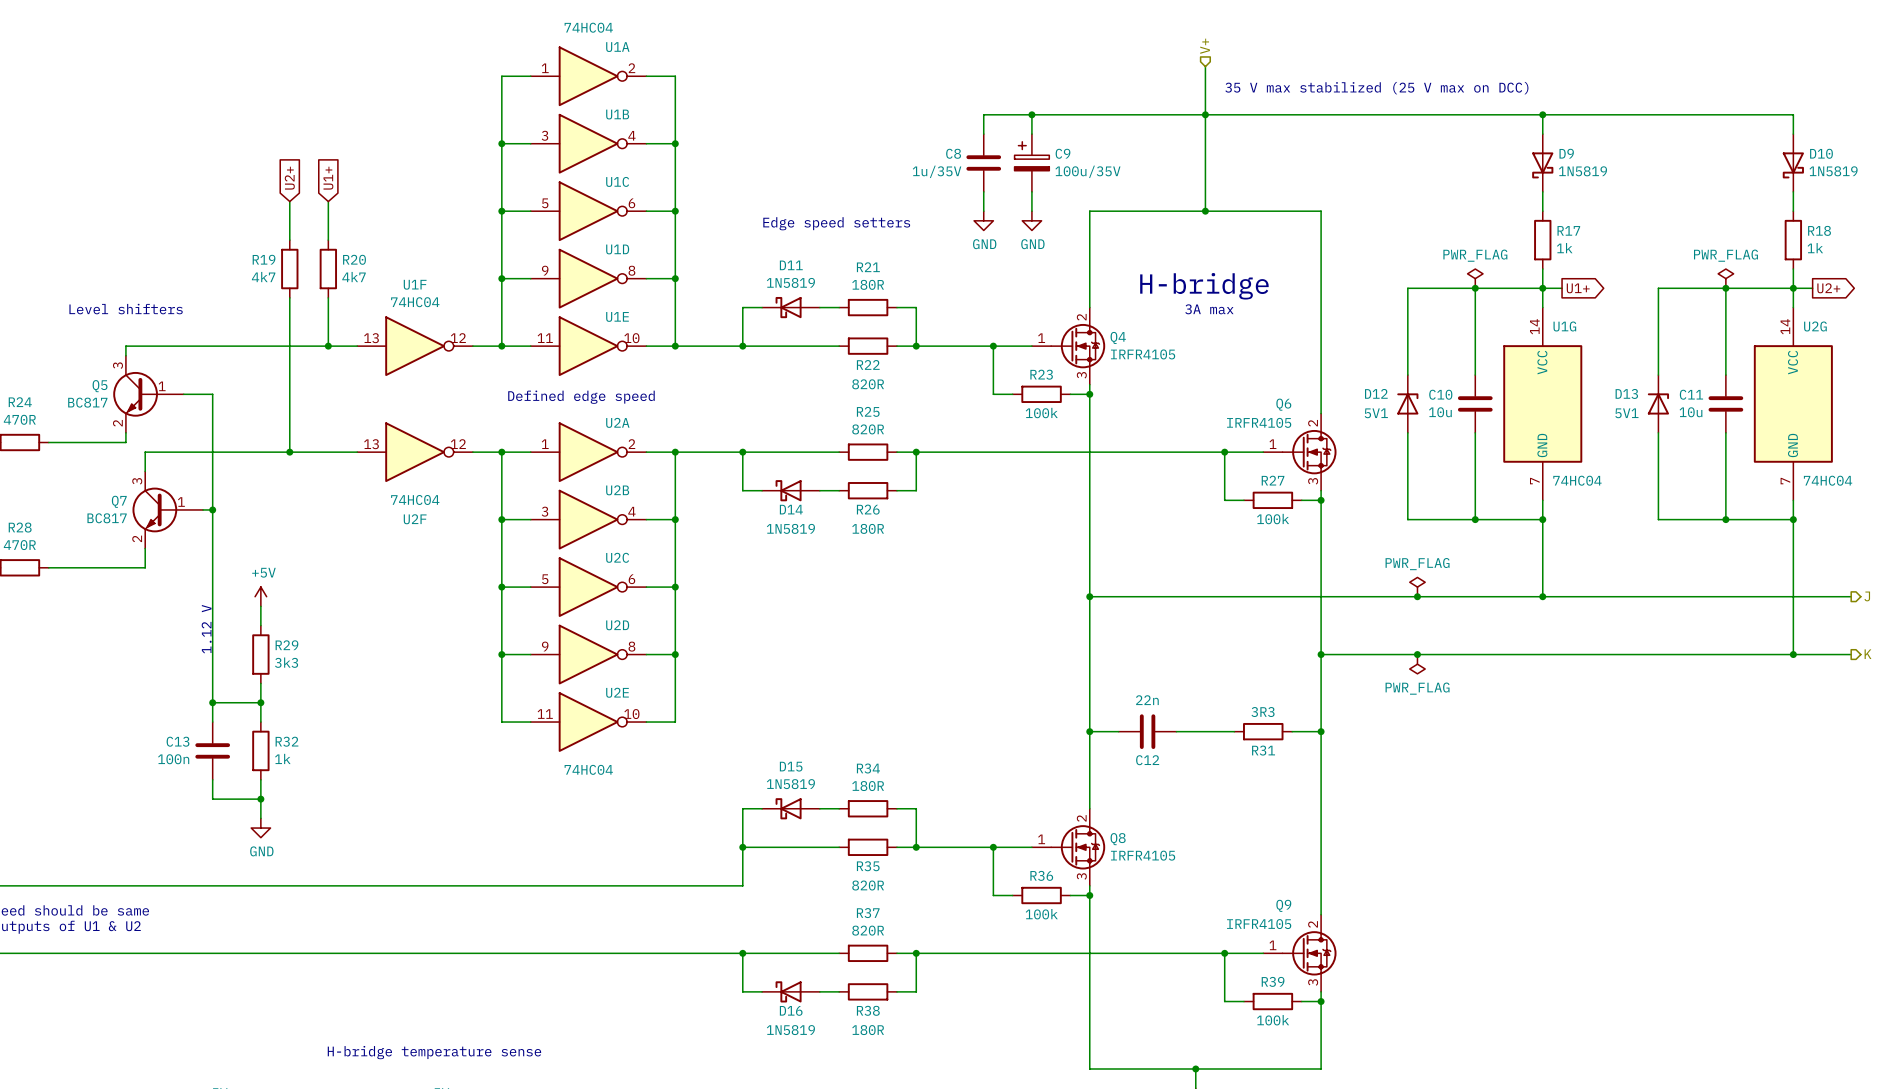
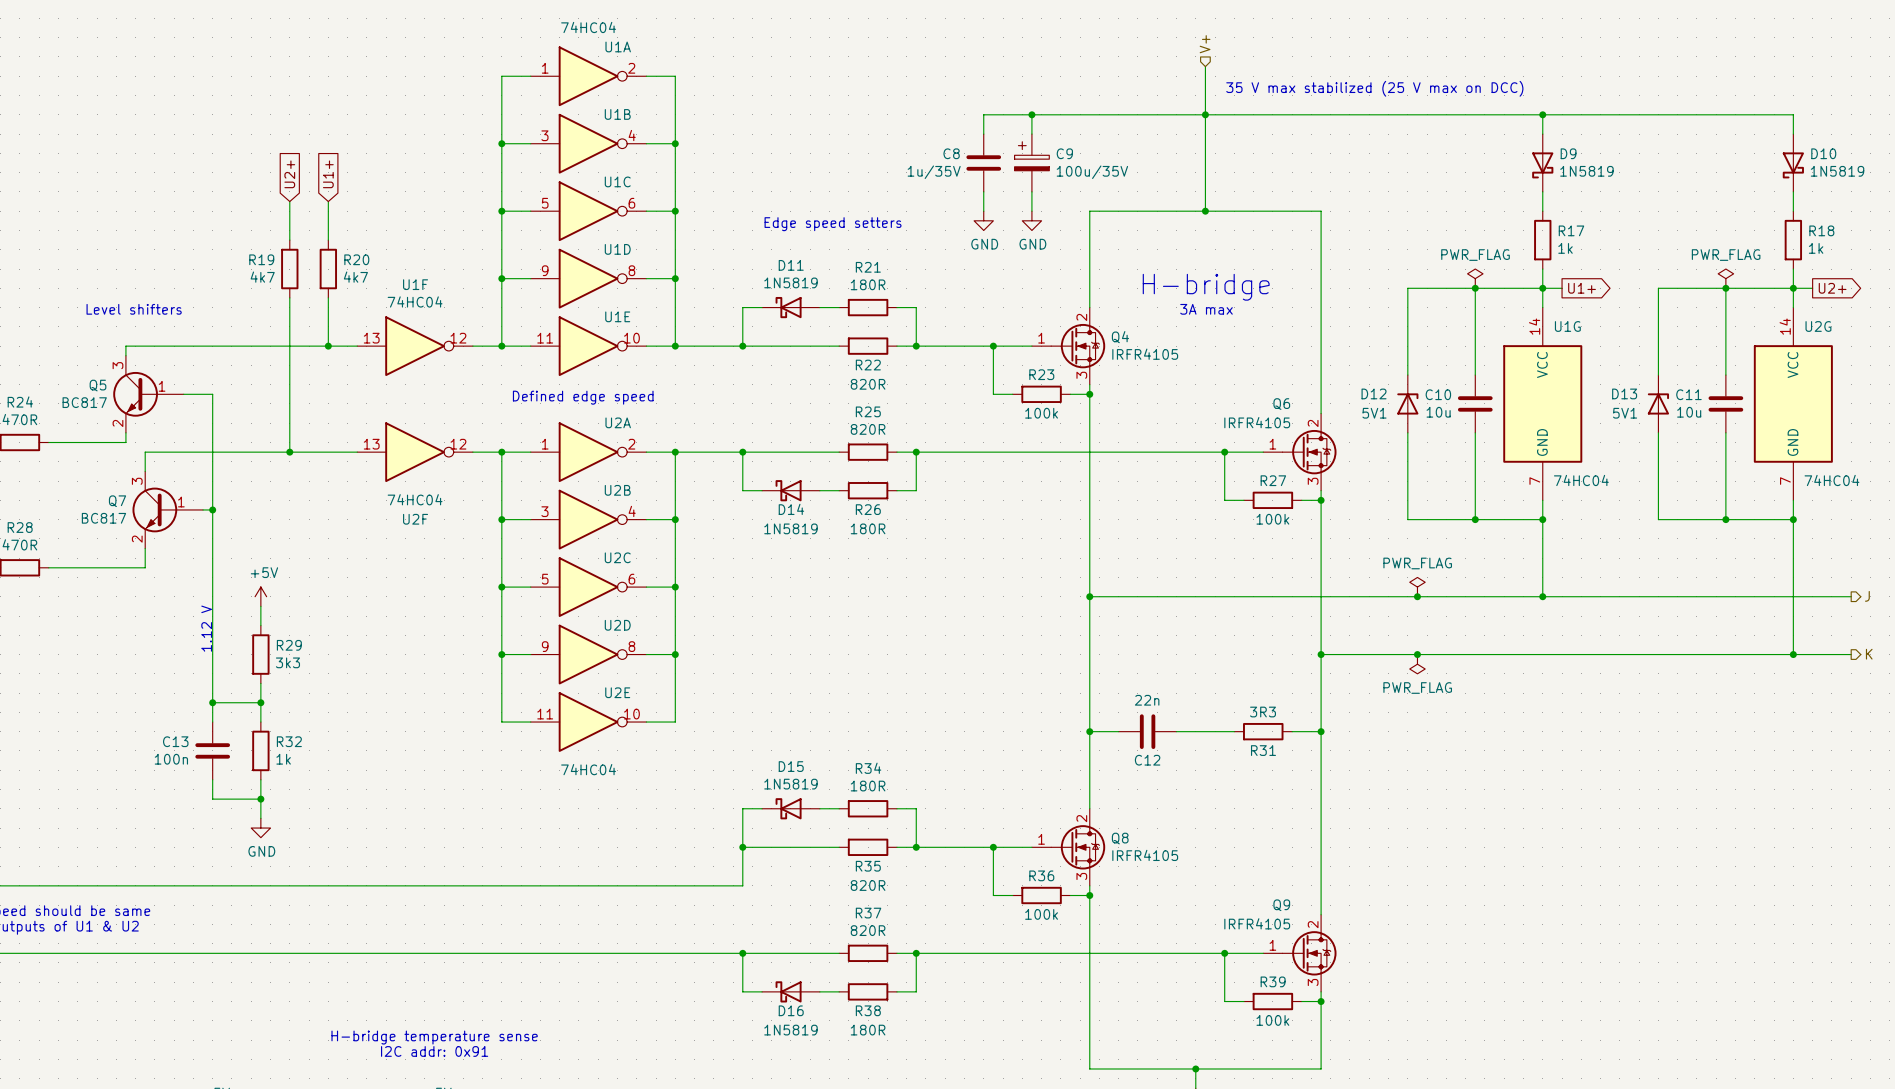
text: none -> H-bridge temperature sense (434, 1037)
text: H-bridge temperature sense (434, 1052) -> I2C addr: 0x91 (434, 1051)

